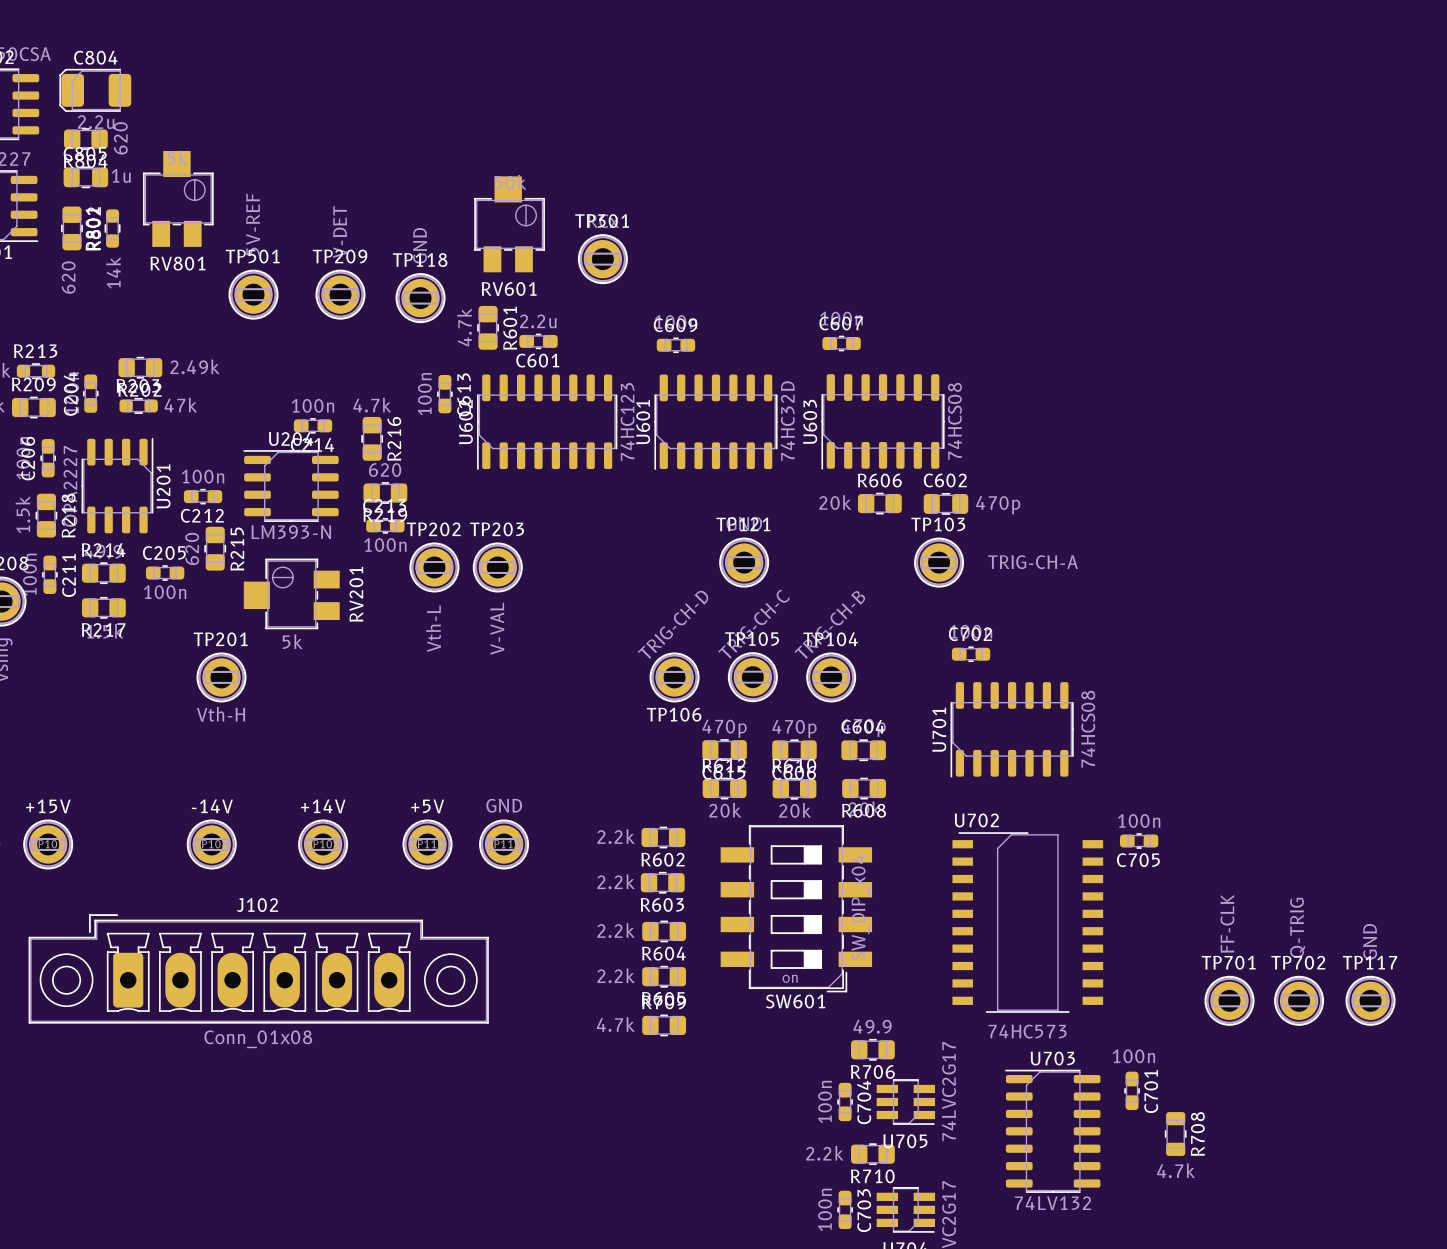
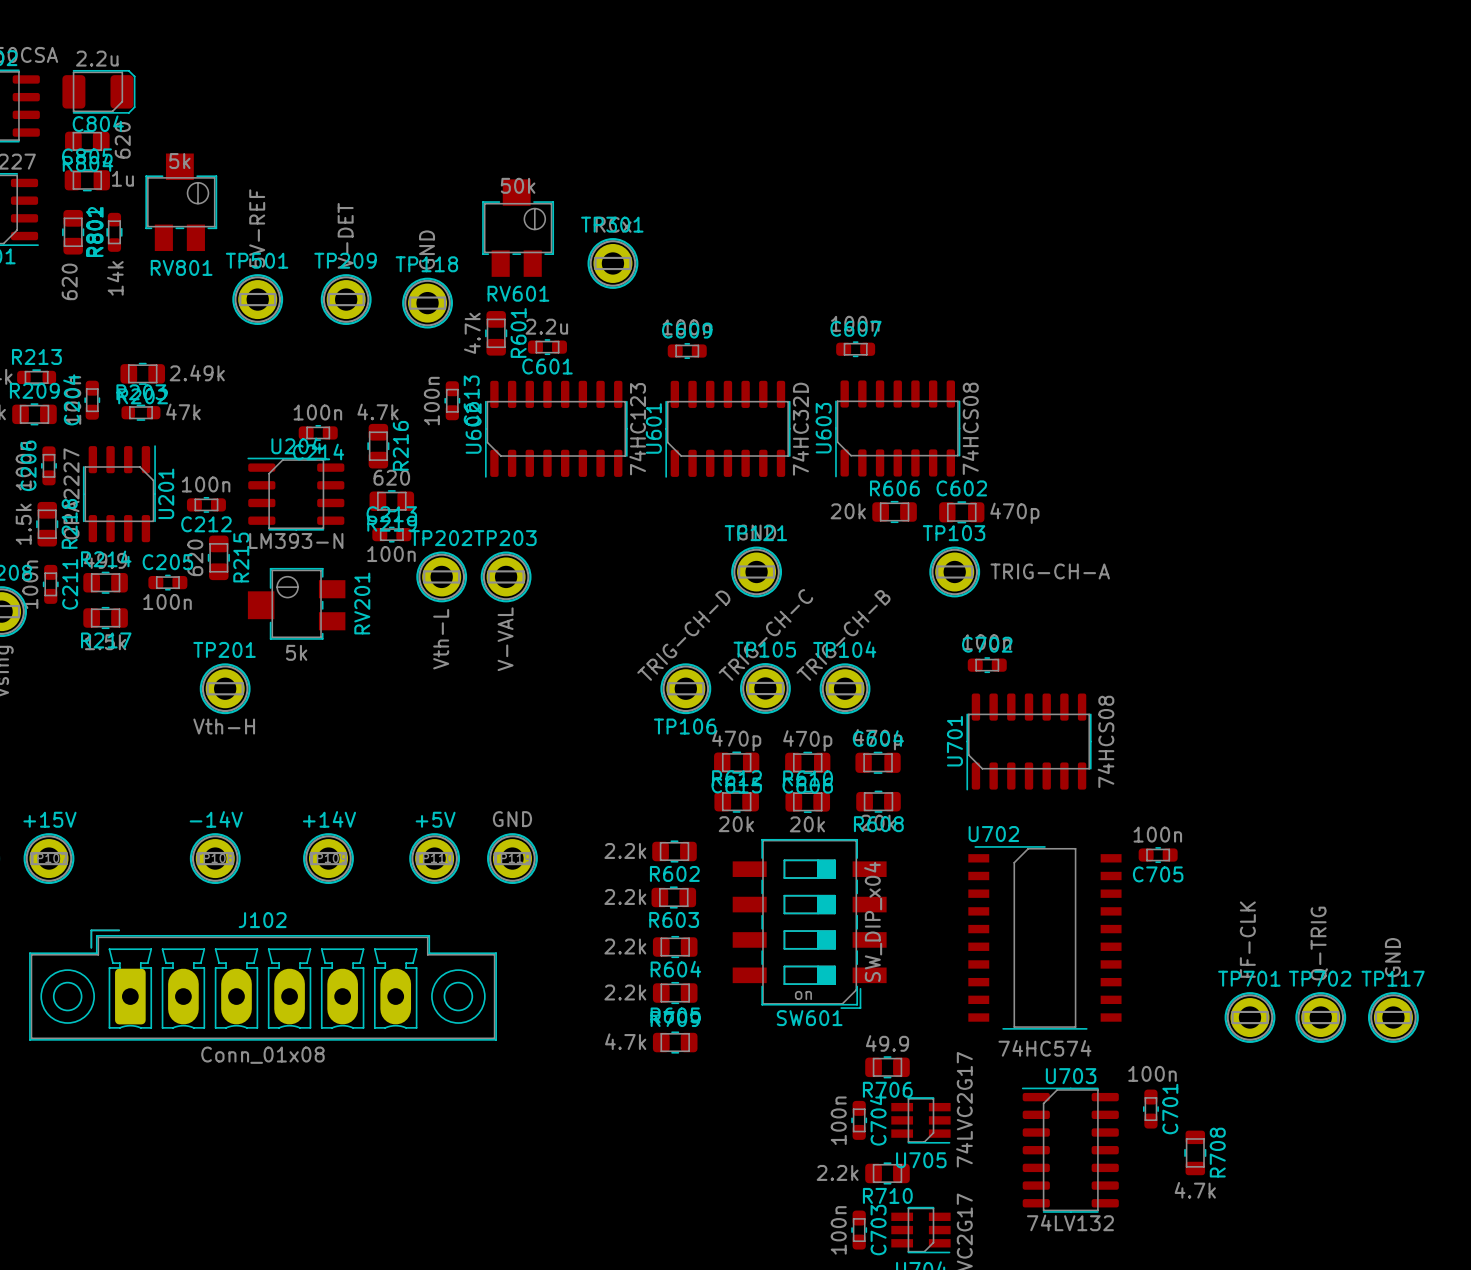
C804 rotation: 0° (95, 90) -> 180° (98, 91)
U702 value: 74HC573 (1027, 1031) -> 74HC574 (1044, 1048)

